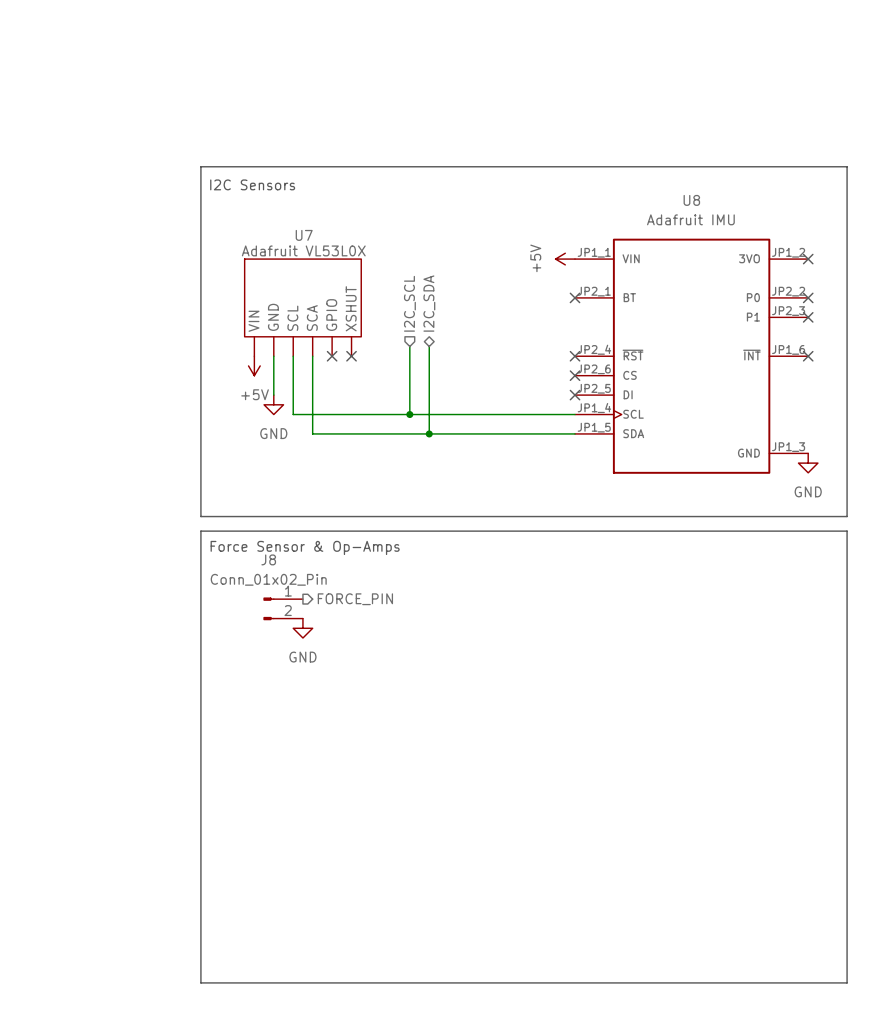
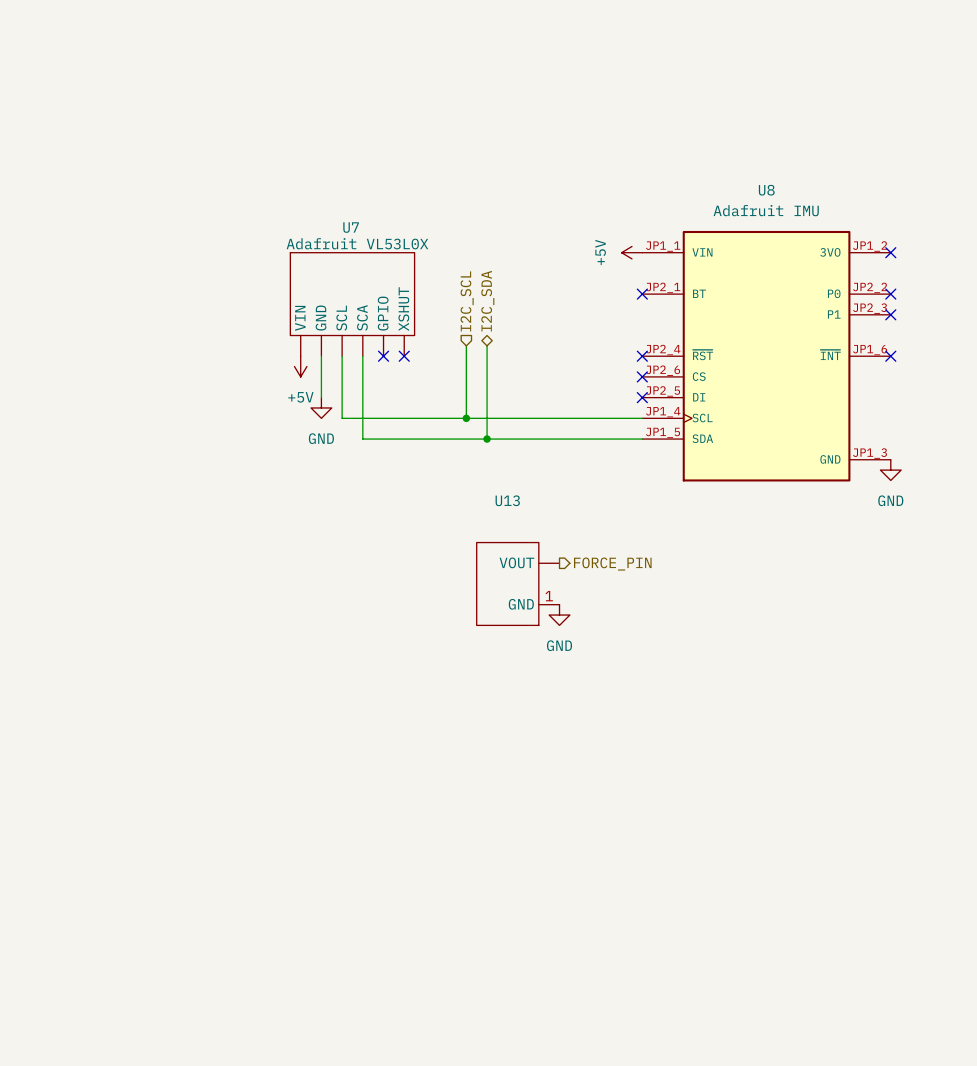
line: (200, 166) (200, 516) (847, 516) (847, 166) (200, 166) -> none
text: I2C Sensors (252, 184) -> none
line: (200, 531) (847, 531) (847, 982) (200, 982) (200, 531) -> none
text: Force Sensor & Op-Amps (305, 547) -> none
hierarchical label: none -> FORCE_PIN (612, 564)
U13: none -> (518, 583)
hierarchical label: FORCE_PIN (355, 599) -> none
power symbol: none -> GND (559, 615)
J8: Conn_01x02_Pin (283, 608) -> none
power symbol: GND (302, 628) -> none

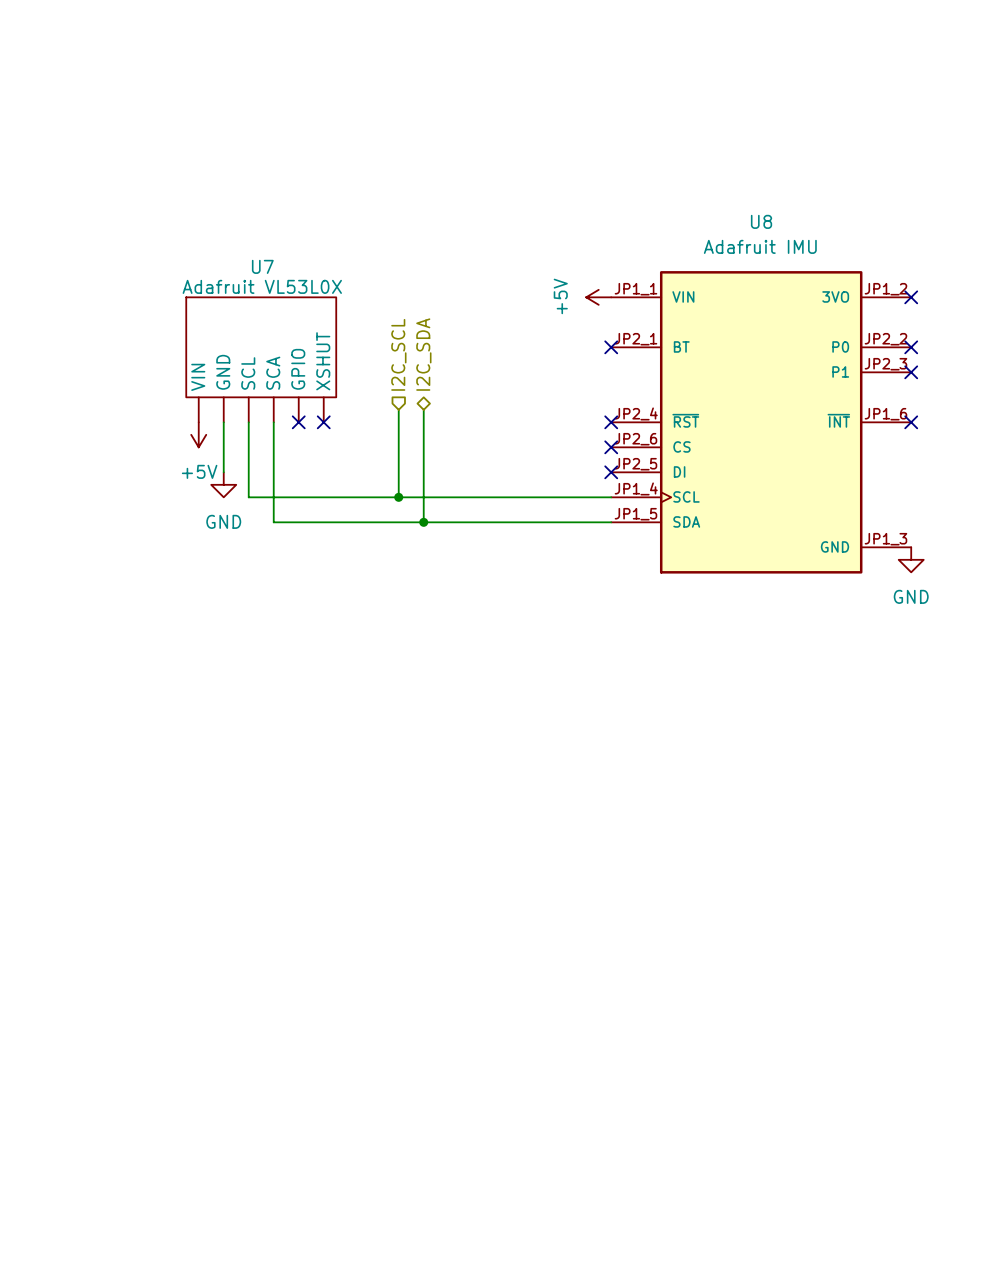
hierarchical label: FORCE_PIN (612, 564) -> none
U13: (518, 583) -> none
power symbol: GND (559, 615) -> none

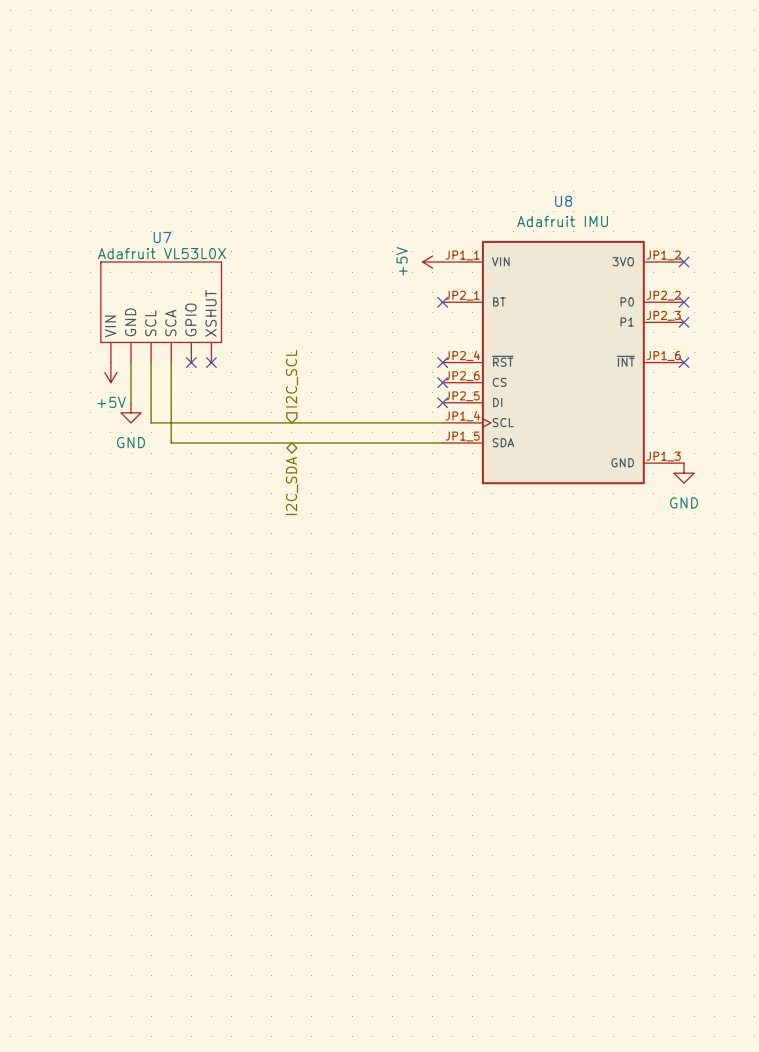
hierarchical label position: I2C_SCL (398, 354) -> I2C_SCL (291, 378)
hierarchical label rotation: 0° (423, 354) -> 180° (291, 486)
hierarchical label position: I2C_SDA (423, 354) -> I2C_SDA (291, 486)
wire: (398, 409) (398, 497) -> none
wire: (423, 409) (423, 522) -> none
junction: (398, 497) -> none
junction: (423, 522) -> none

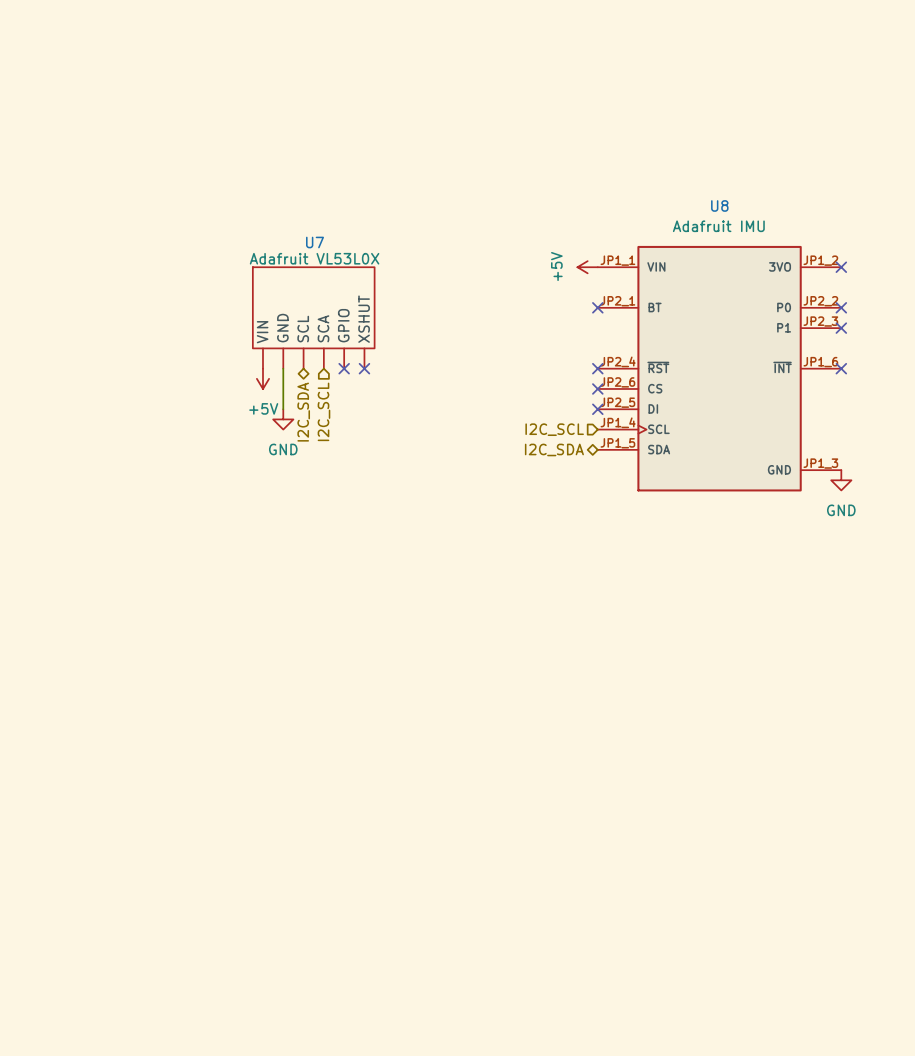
wire: (151, 362) (151, 422) (442, 422) -> none
wire: (171, 362) (171, 443) (442, 443) -> none
hierarchical label: I2C_SCL (291, 378) -> none
hierarchical label: none -> I2C_SDA (303, 412)
hierarchical label: none -> I2C_SCL (323, 411)
hierarchical label: none -> I2C_SCL (554, 429)
hierarchical label: none -> I2C_SDA (554, 449)
hierarchical label: I2C_SDA (291, 486) -> none

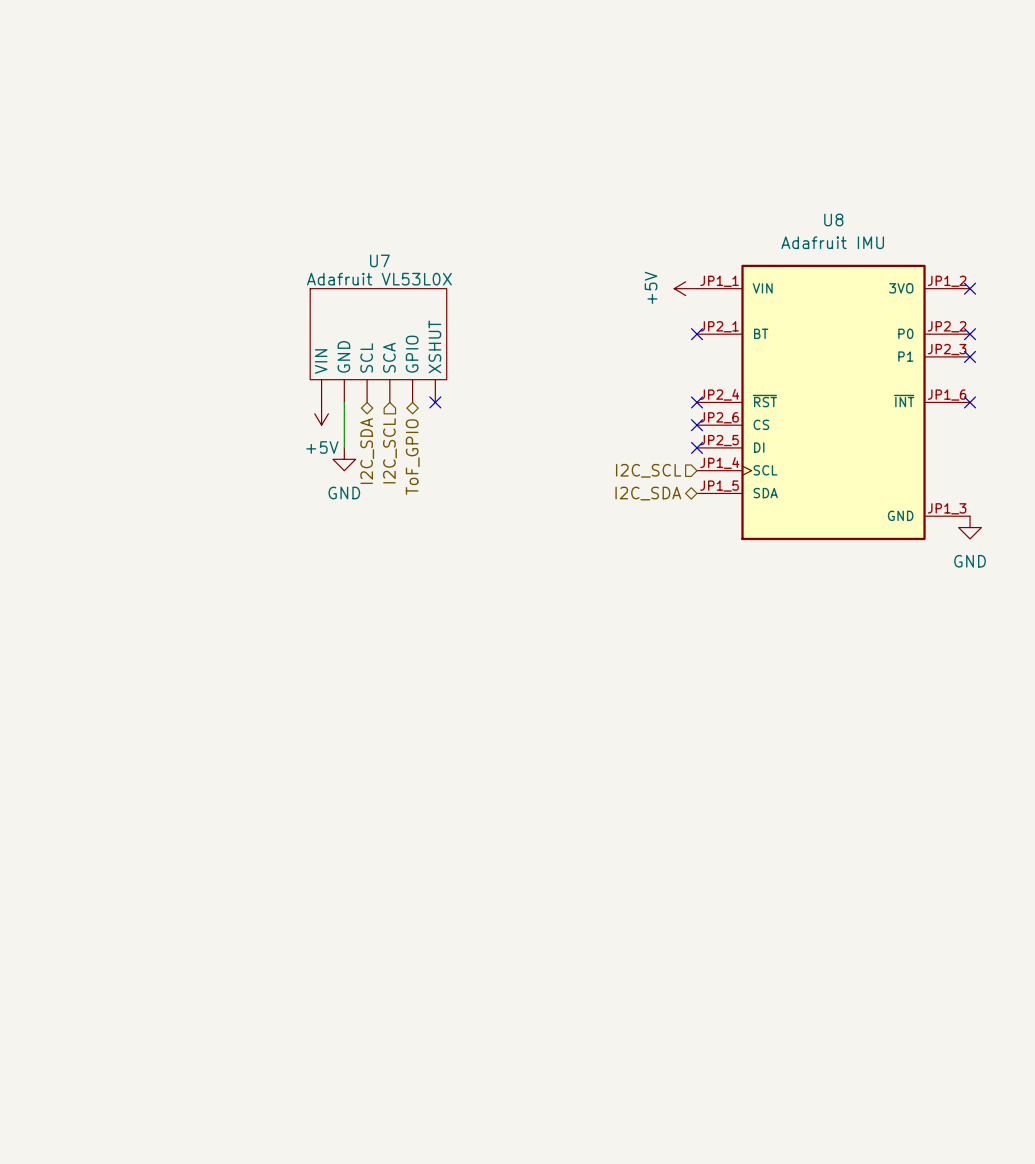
no-connect mark: (344, 368) -> none
hierarchical label: none -> ToF_GPIO (412, 457)

